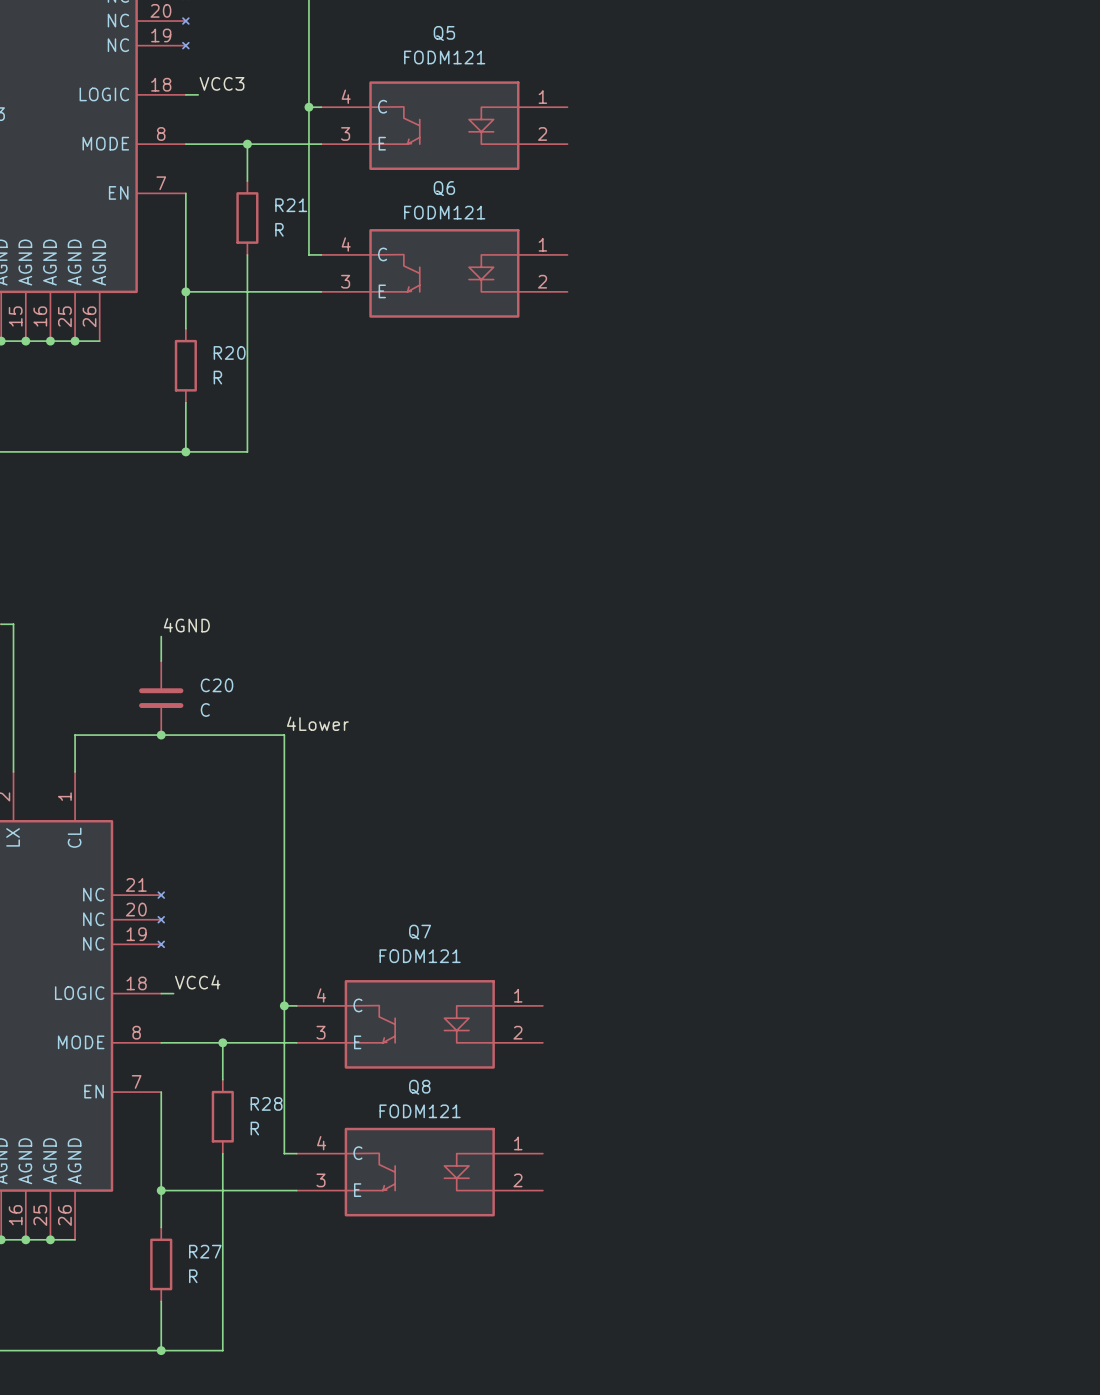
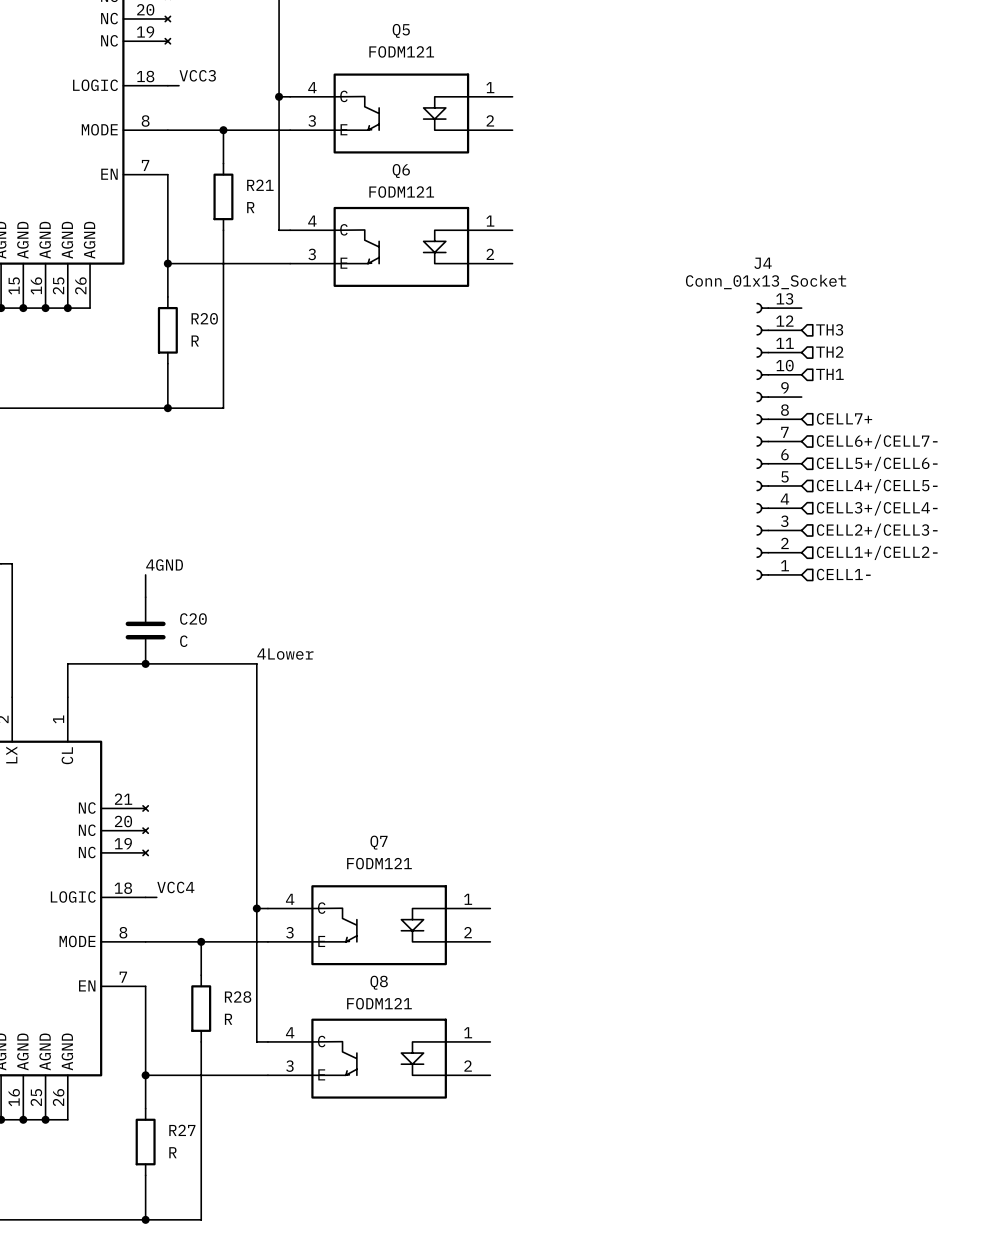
hierarchical label: none -> TH3 (829, 329)
hierarchical label: none -> TH2 (829, 352)
hierarchical label: none -> TH1 (829, 374)
hierarchical label: none -> CELL7+ (844, 418)
J4: none -> Conn_01x13_Socket (779, 441)
hierarchical label: none -> CELL6+/CELL7- (877, 441)
hierarchical label: none -> CELL5+/CELL6- (877, 463)
hierarchical label: none -> CELL4+/CELL5- (877, 486)
hierarchical label: none -> CELL3+/CELL4- (877, 508)
hierarchical label: none -> CELL2+/CELL3- (877, 530)
hierarchical label: none -> CELL1+/CELL2- (877, 552)
hierarchical label: none -> CELL1- (843, 574)

